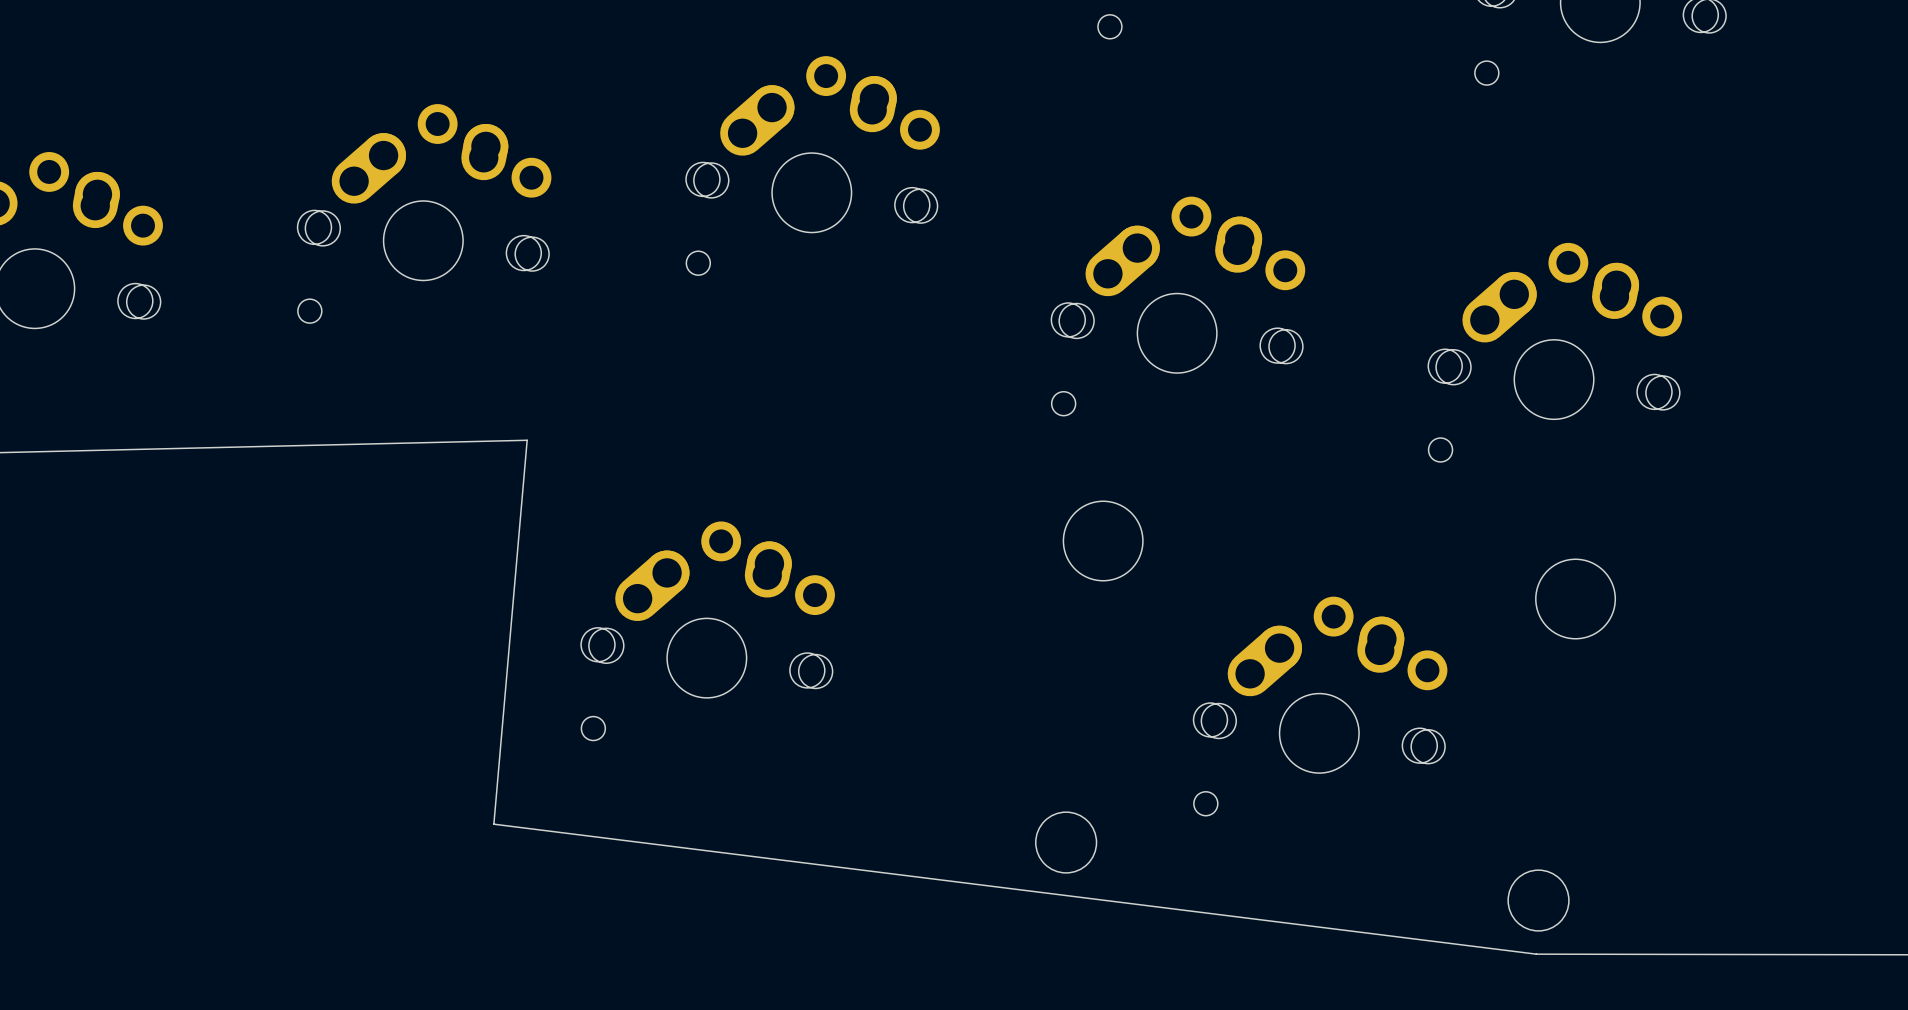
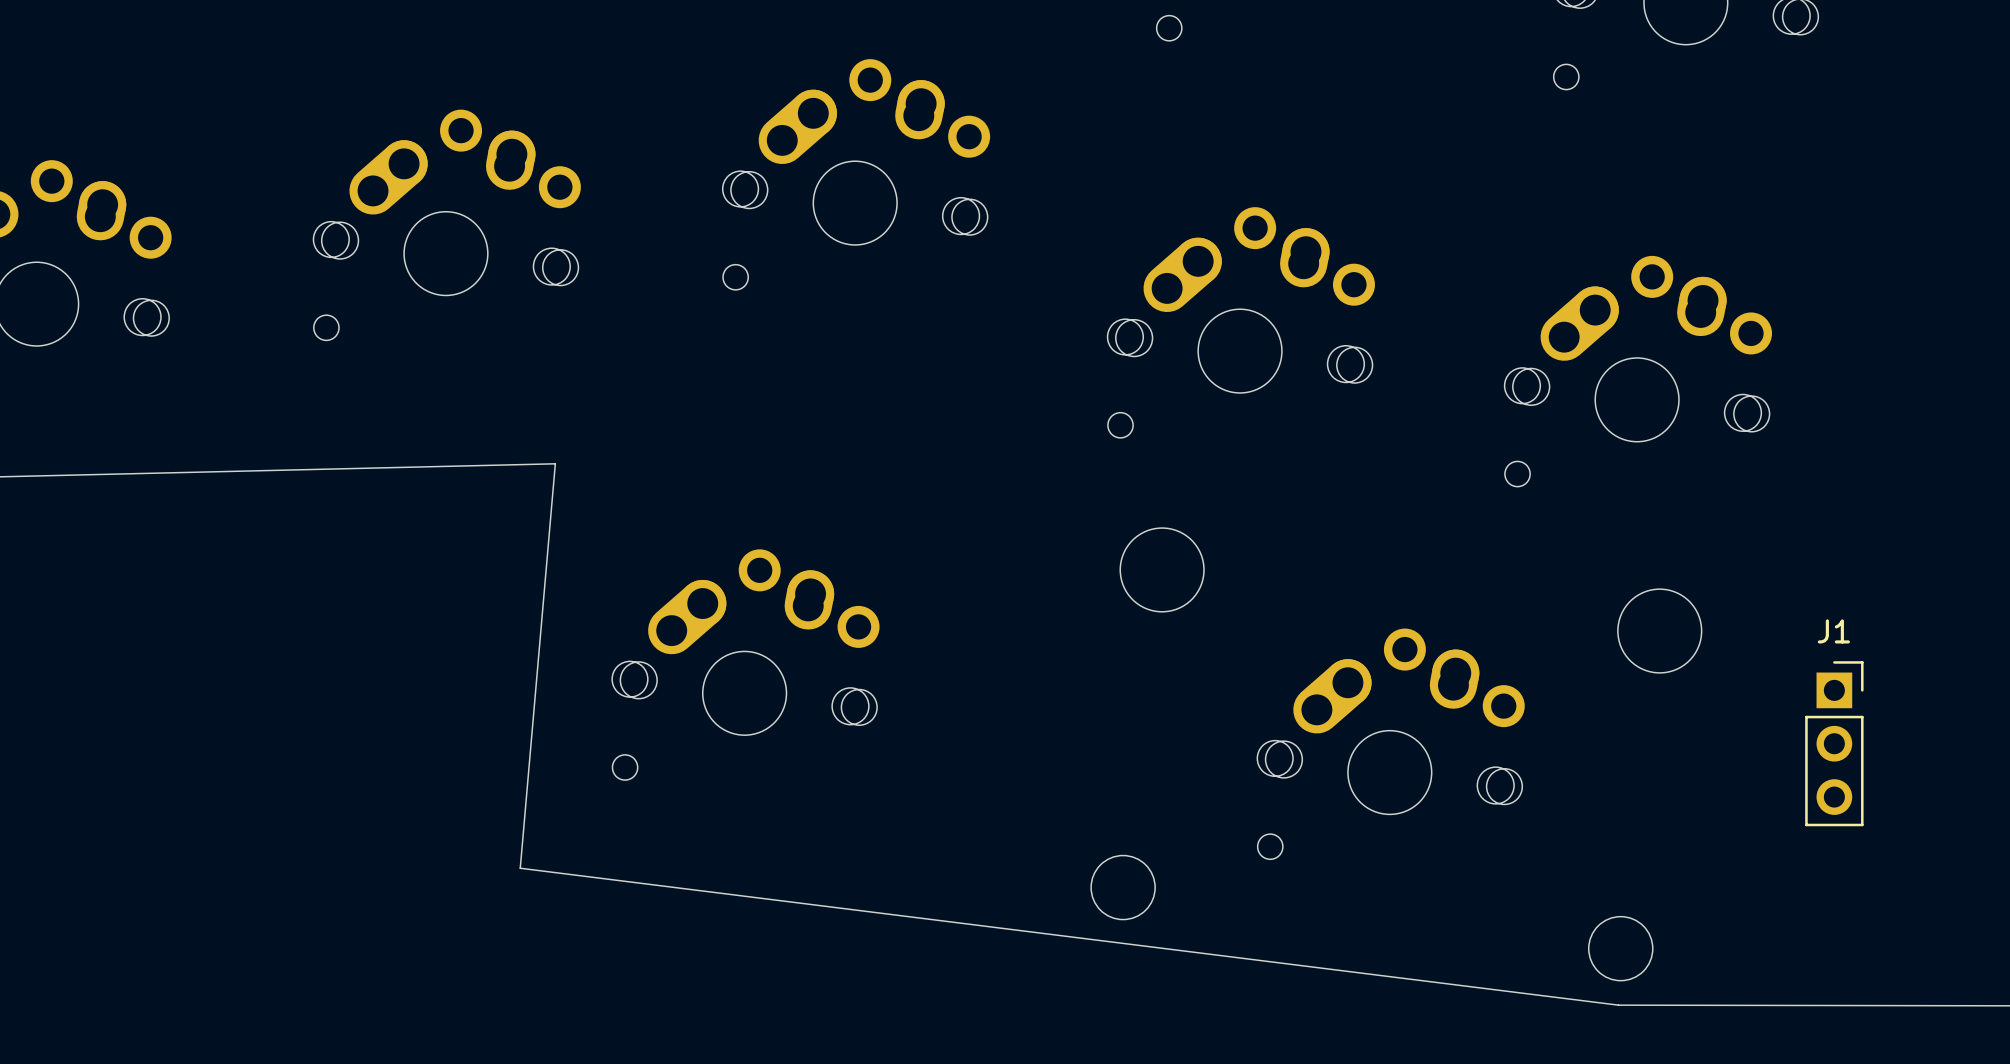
J1: none -> (1834, 743)

